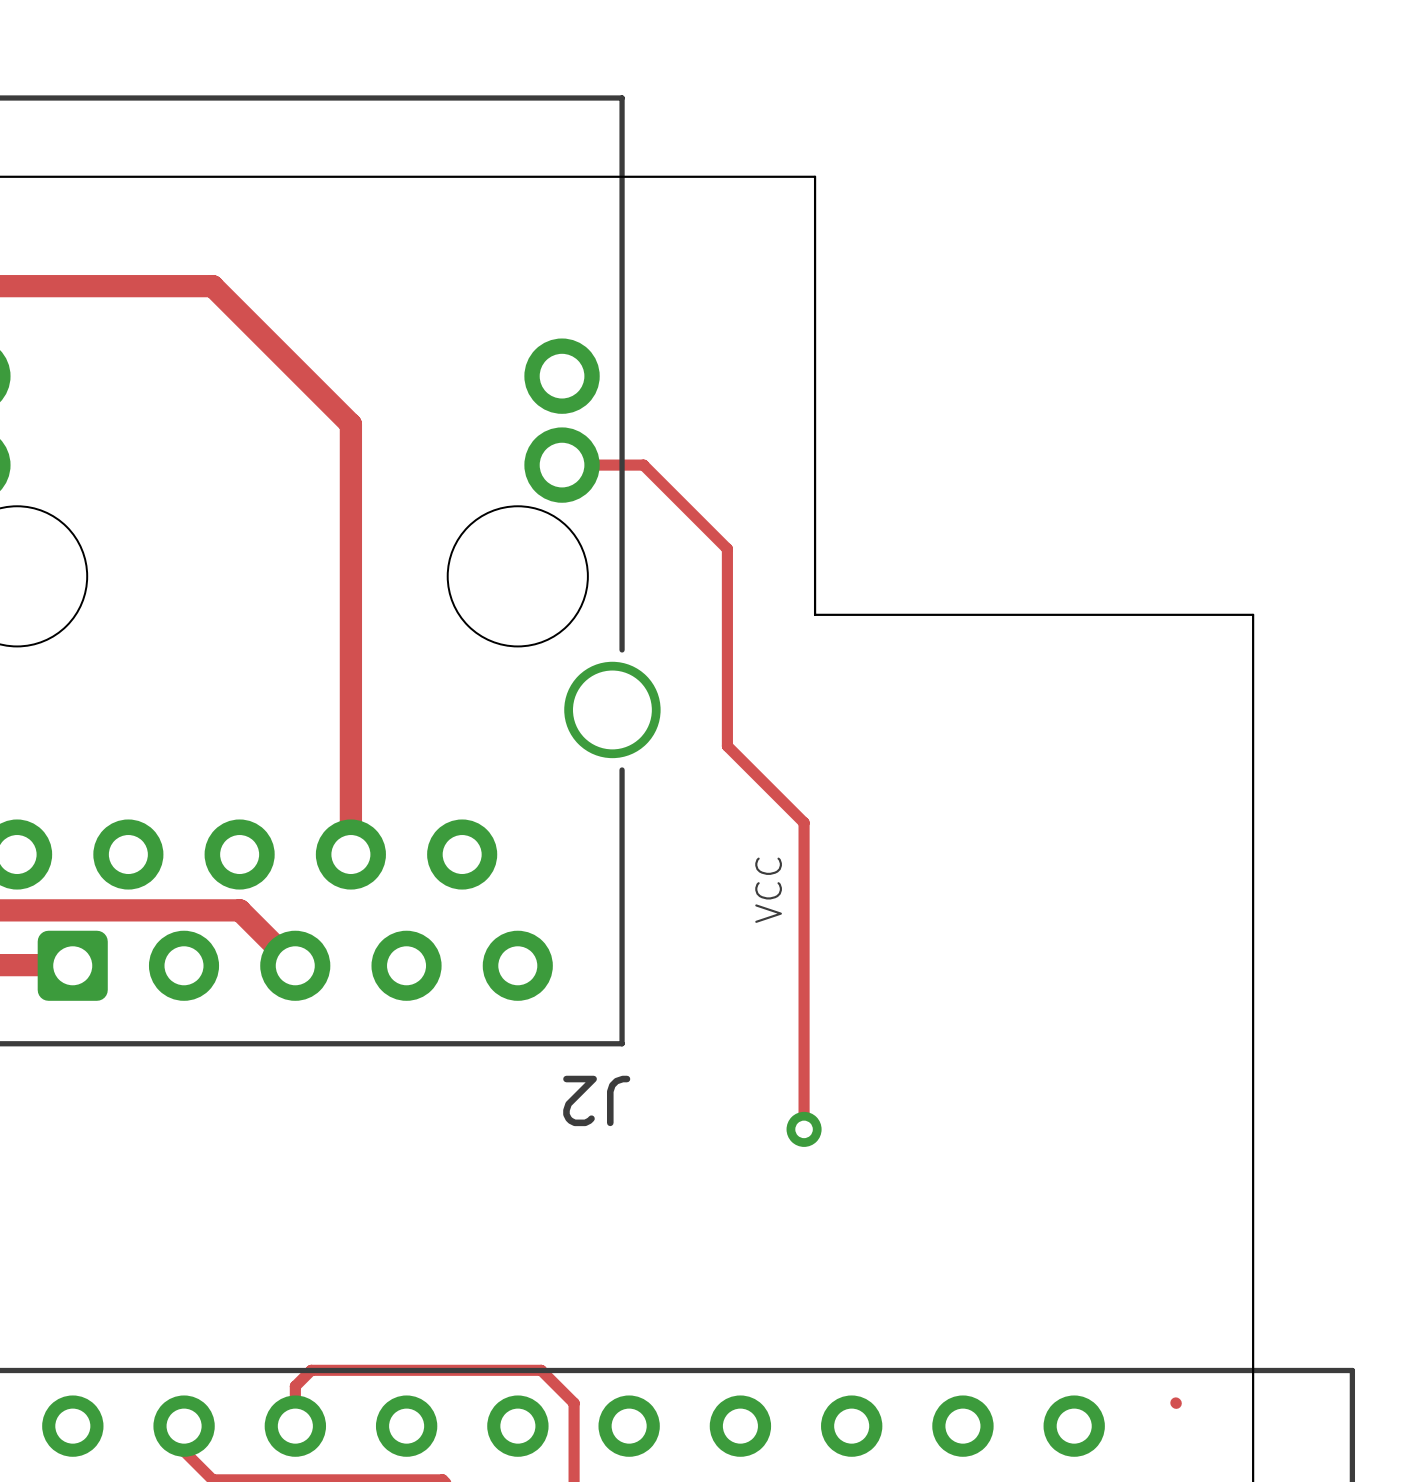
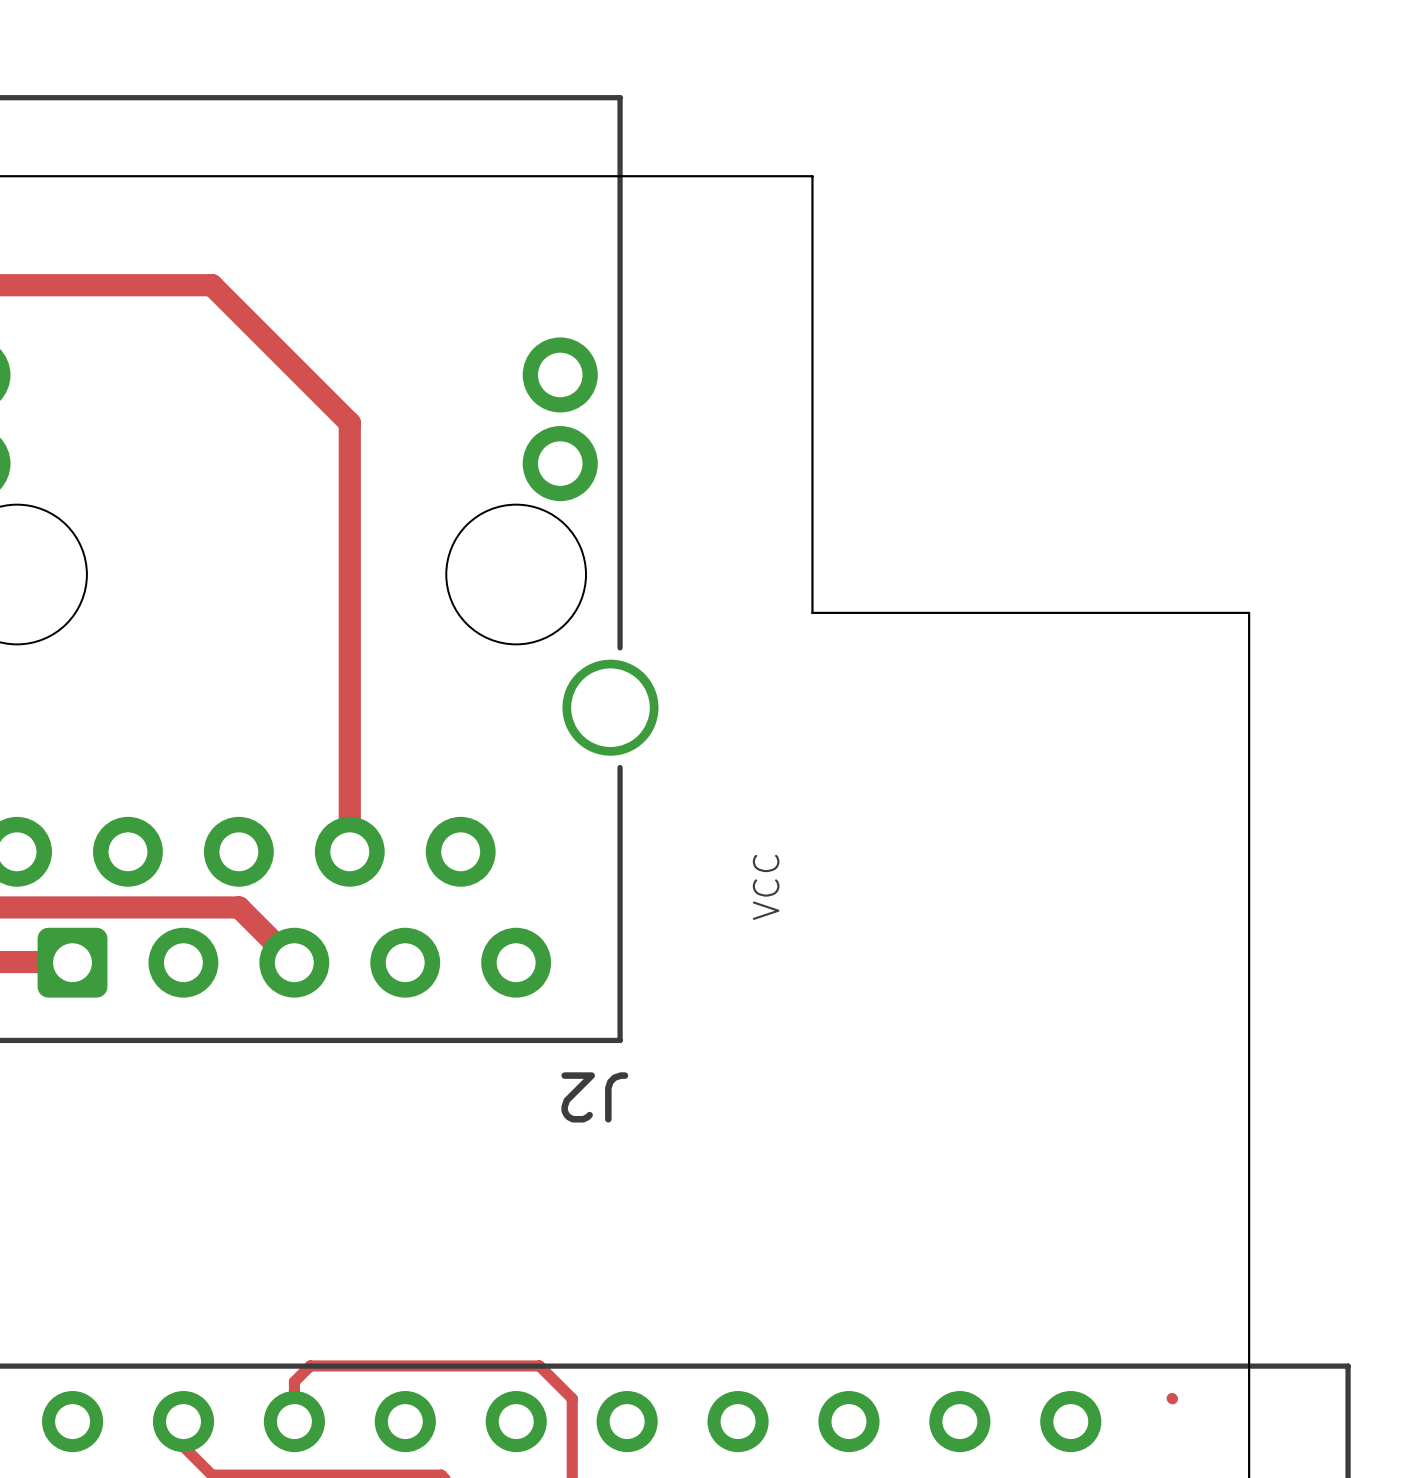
track: (562, 465) (643, 465) (727, 548) (727, 746) (804, 822) (804, 1129) -> none
via: (804, 1129) -> none

